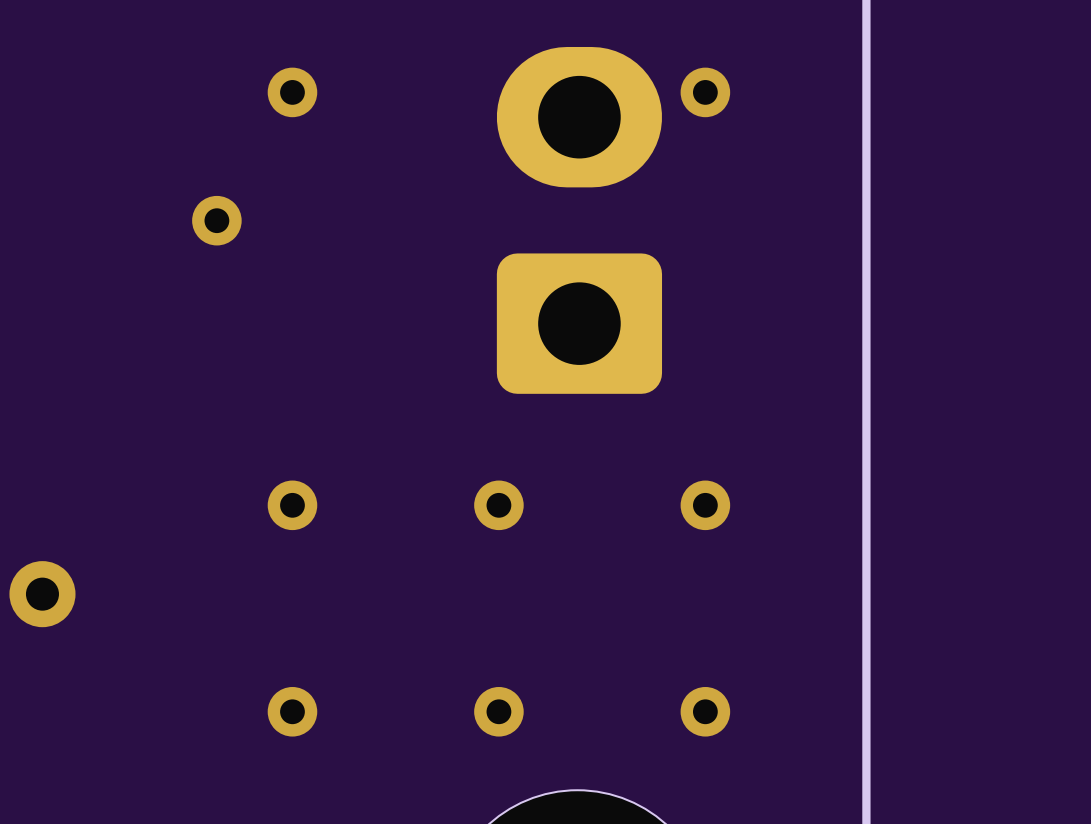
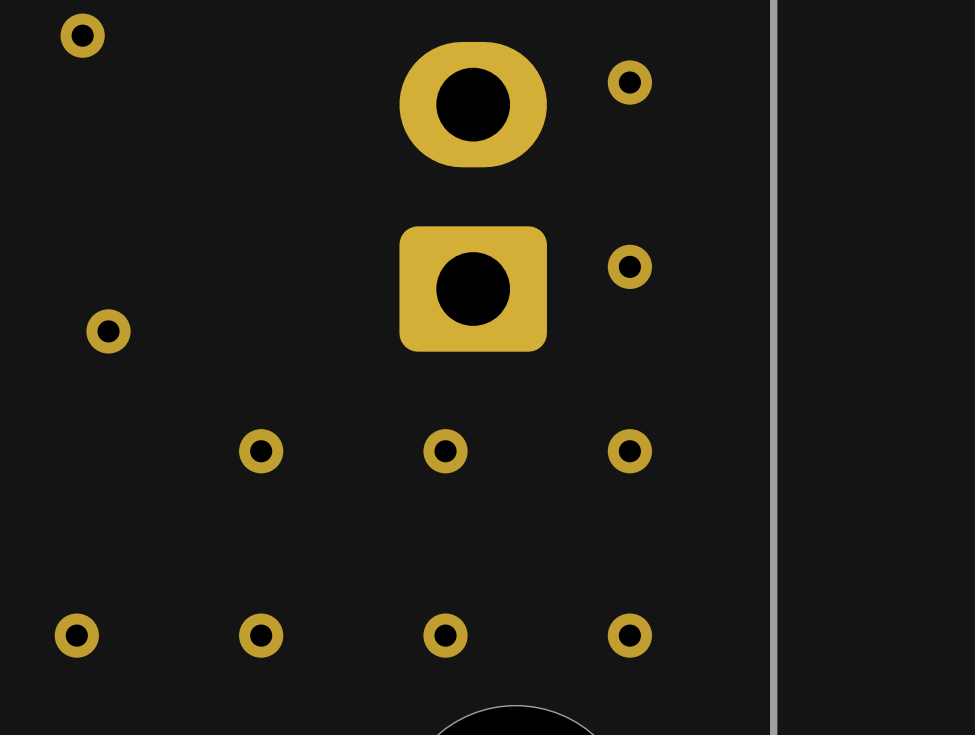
via: none -> (82, 35)
via: (292, 92) -> none
via: (216, 220) -> none
part position: (579, 220) -> (473, 196)
via: none -> (629, 266)
via: none -> (108, 331)
via: (42, 594) -> none
via: none -> (76, 635)

